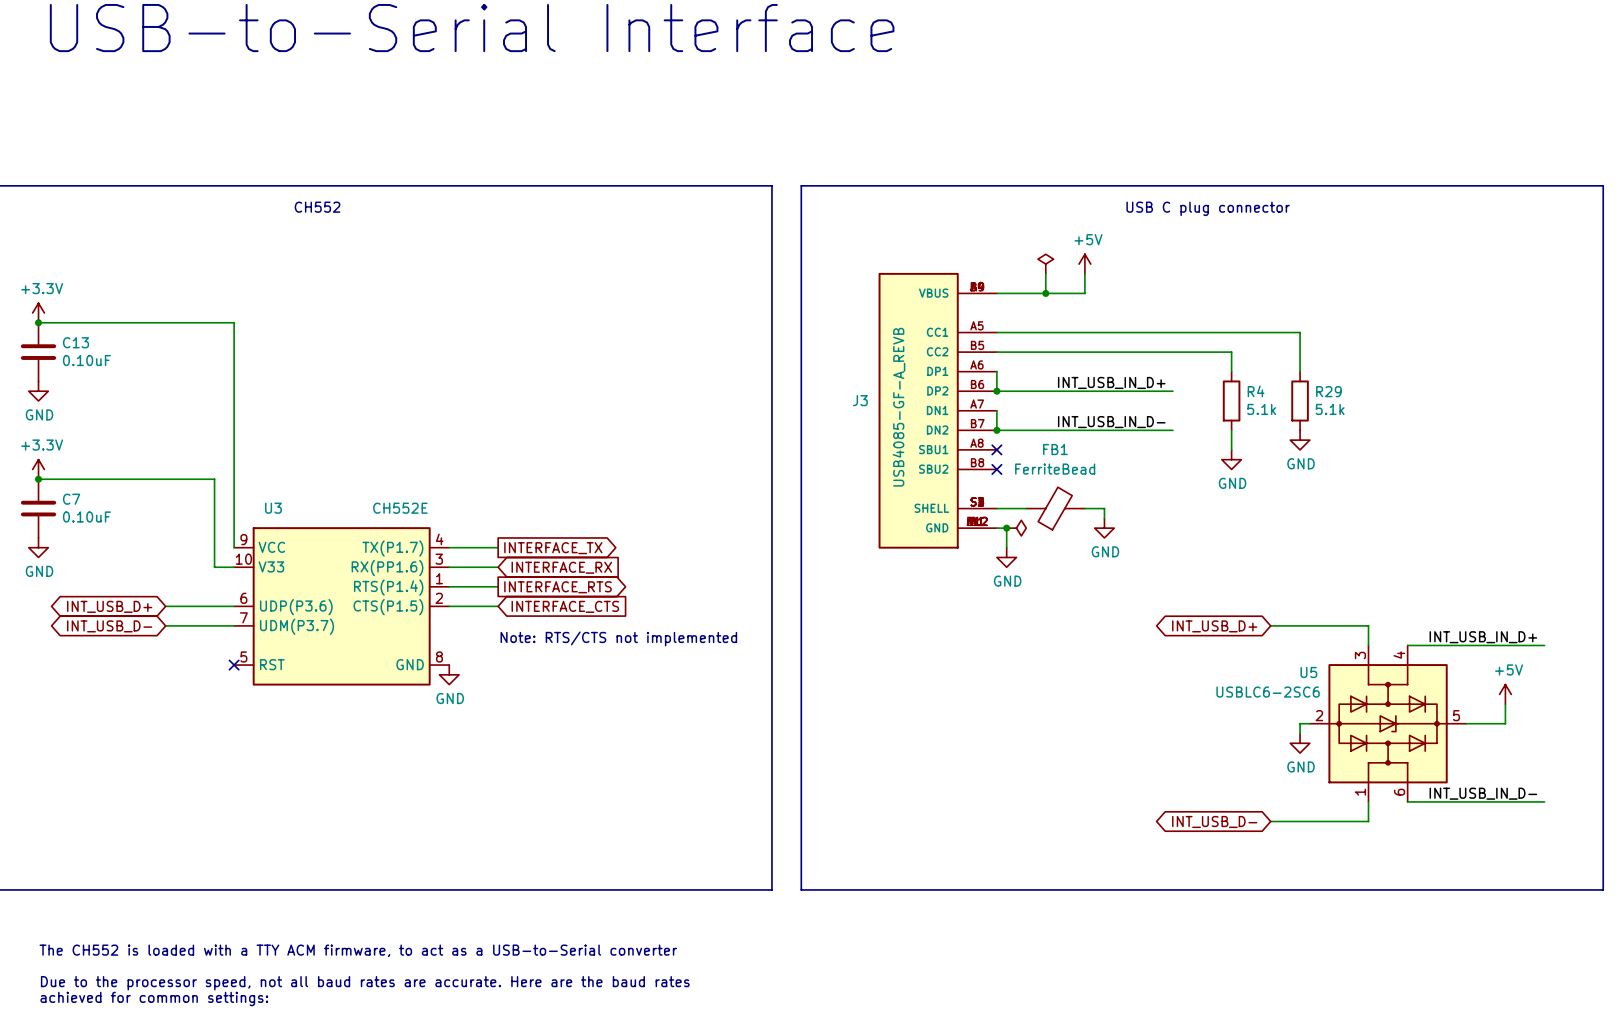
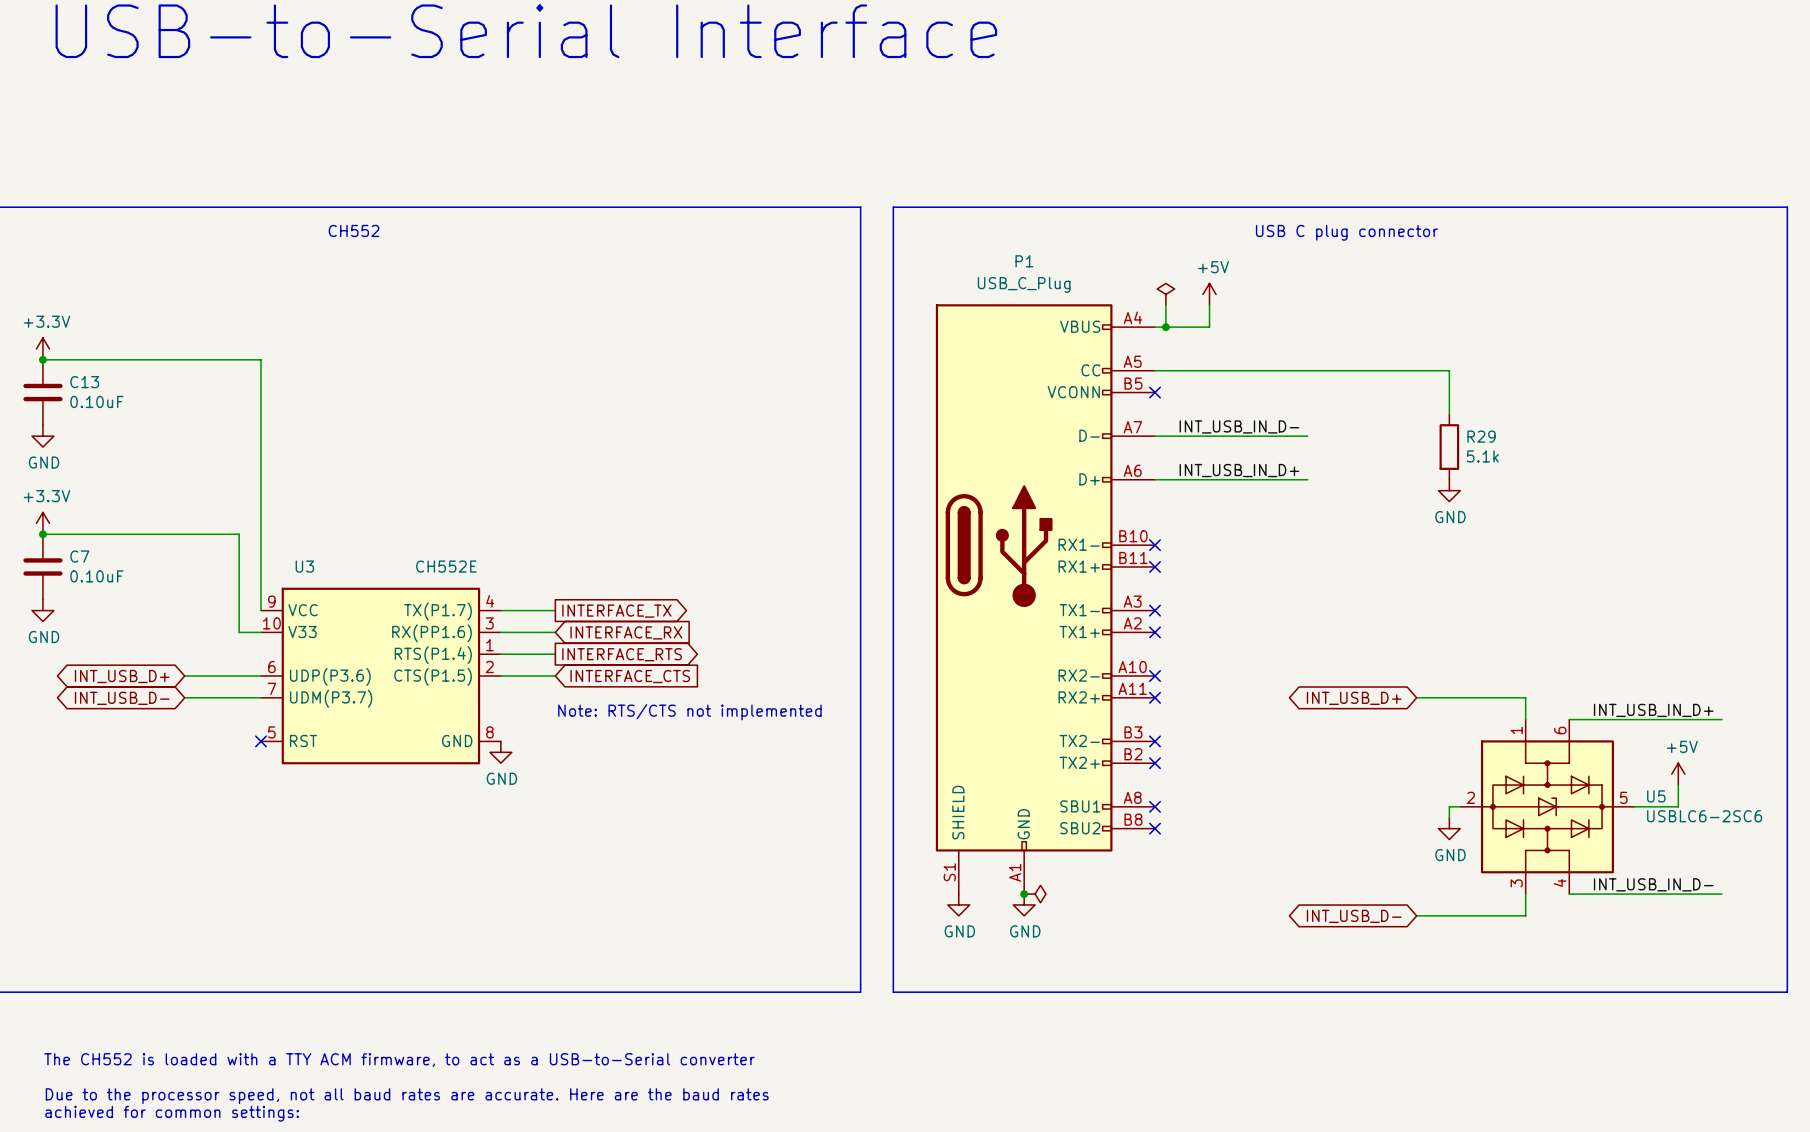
wire: (996, 352) (1231, 352) (1231, 371) -> none
no-connect mark: none -> (1155, 392)
label: INT_USB_IN_D+ (1111, 382) -> INT_USB_IN_D- (1239, 426)
junction: (996, 391) -> none
R4: 5.1k (1231, 401) -> none
J3: USB4085-GF-A_REVB (937, 410) -> none
label: INT_USB_IN_D- (1111, 422) -> INT_USB_IN_D+ (1239, 470)
junction: (996, 430) -> none
wire: (1231, 430) (1231, 449) -> none
no-connect mark: (996, 449) -> none
power symbol: GND (1231, 459) -> none
no-connect mark: (996, 469) -> none
no-connect mark: none -> (1155, 545)
no-connect mark: none -> (1155, 566)
FB1: FerriteBead (1055, 508) -> none
wire: (1084, 508) (1104, 508) (1104, 518) -> none
wire: (996, 528) (1006, 528) (1006, 547) -> none
junction: (1006, 528) -> none
power symbol: (1016, 528) -> none
power symbol: GND (1104, 528) -> none
P1: none -> USB_C_Plug (1045, 599)
no-connect mark: none -> (1155, 610)
power symbol: GND (1006, 557) -> none
no-connect mark: none -> (1155, 632)
no-connect mark: none -> (1155, 676)
no-connect mark: none -> (1155, 697)
no-connect mark: none -> (1155, 741)
U5 name position: U5 (1308, 672) -> U5 (1656, 796)
no-connect mark: none -> (1155, 763)
U5 value position: USBLC6-2SC6 (1268, 692) -> USBLC6-2SC6 (1704, 816)
no-connect mark: none -> (1155, 806)
U5 flip: as is (1388, 723) -> up-down (1547, 806)
no-connect mark: none -> (1155, 828)
junction: none -> (1024, 894)
power symbol: none -> (1035, 894)
power symbol: none -> GND (958, 904)
power symbol: none -> GND (1024, 904)

